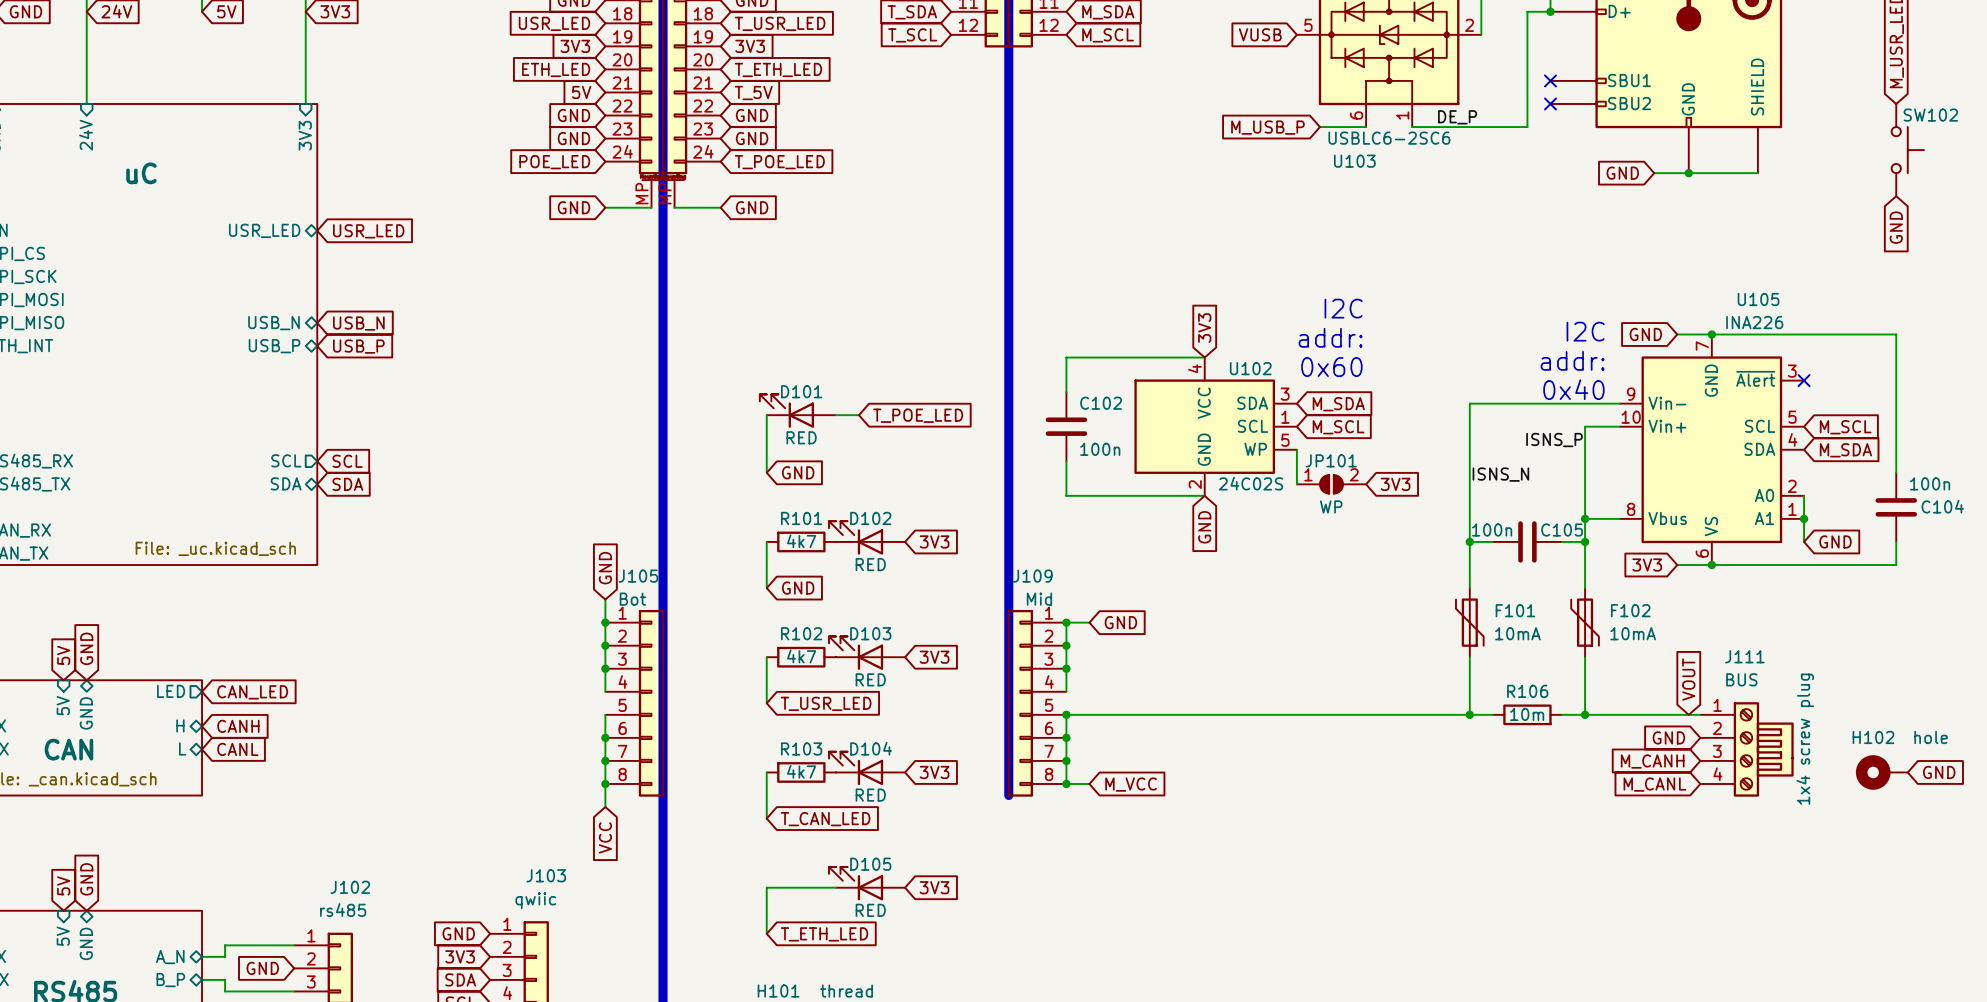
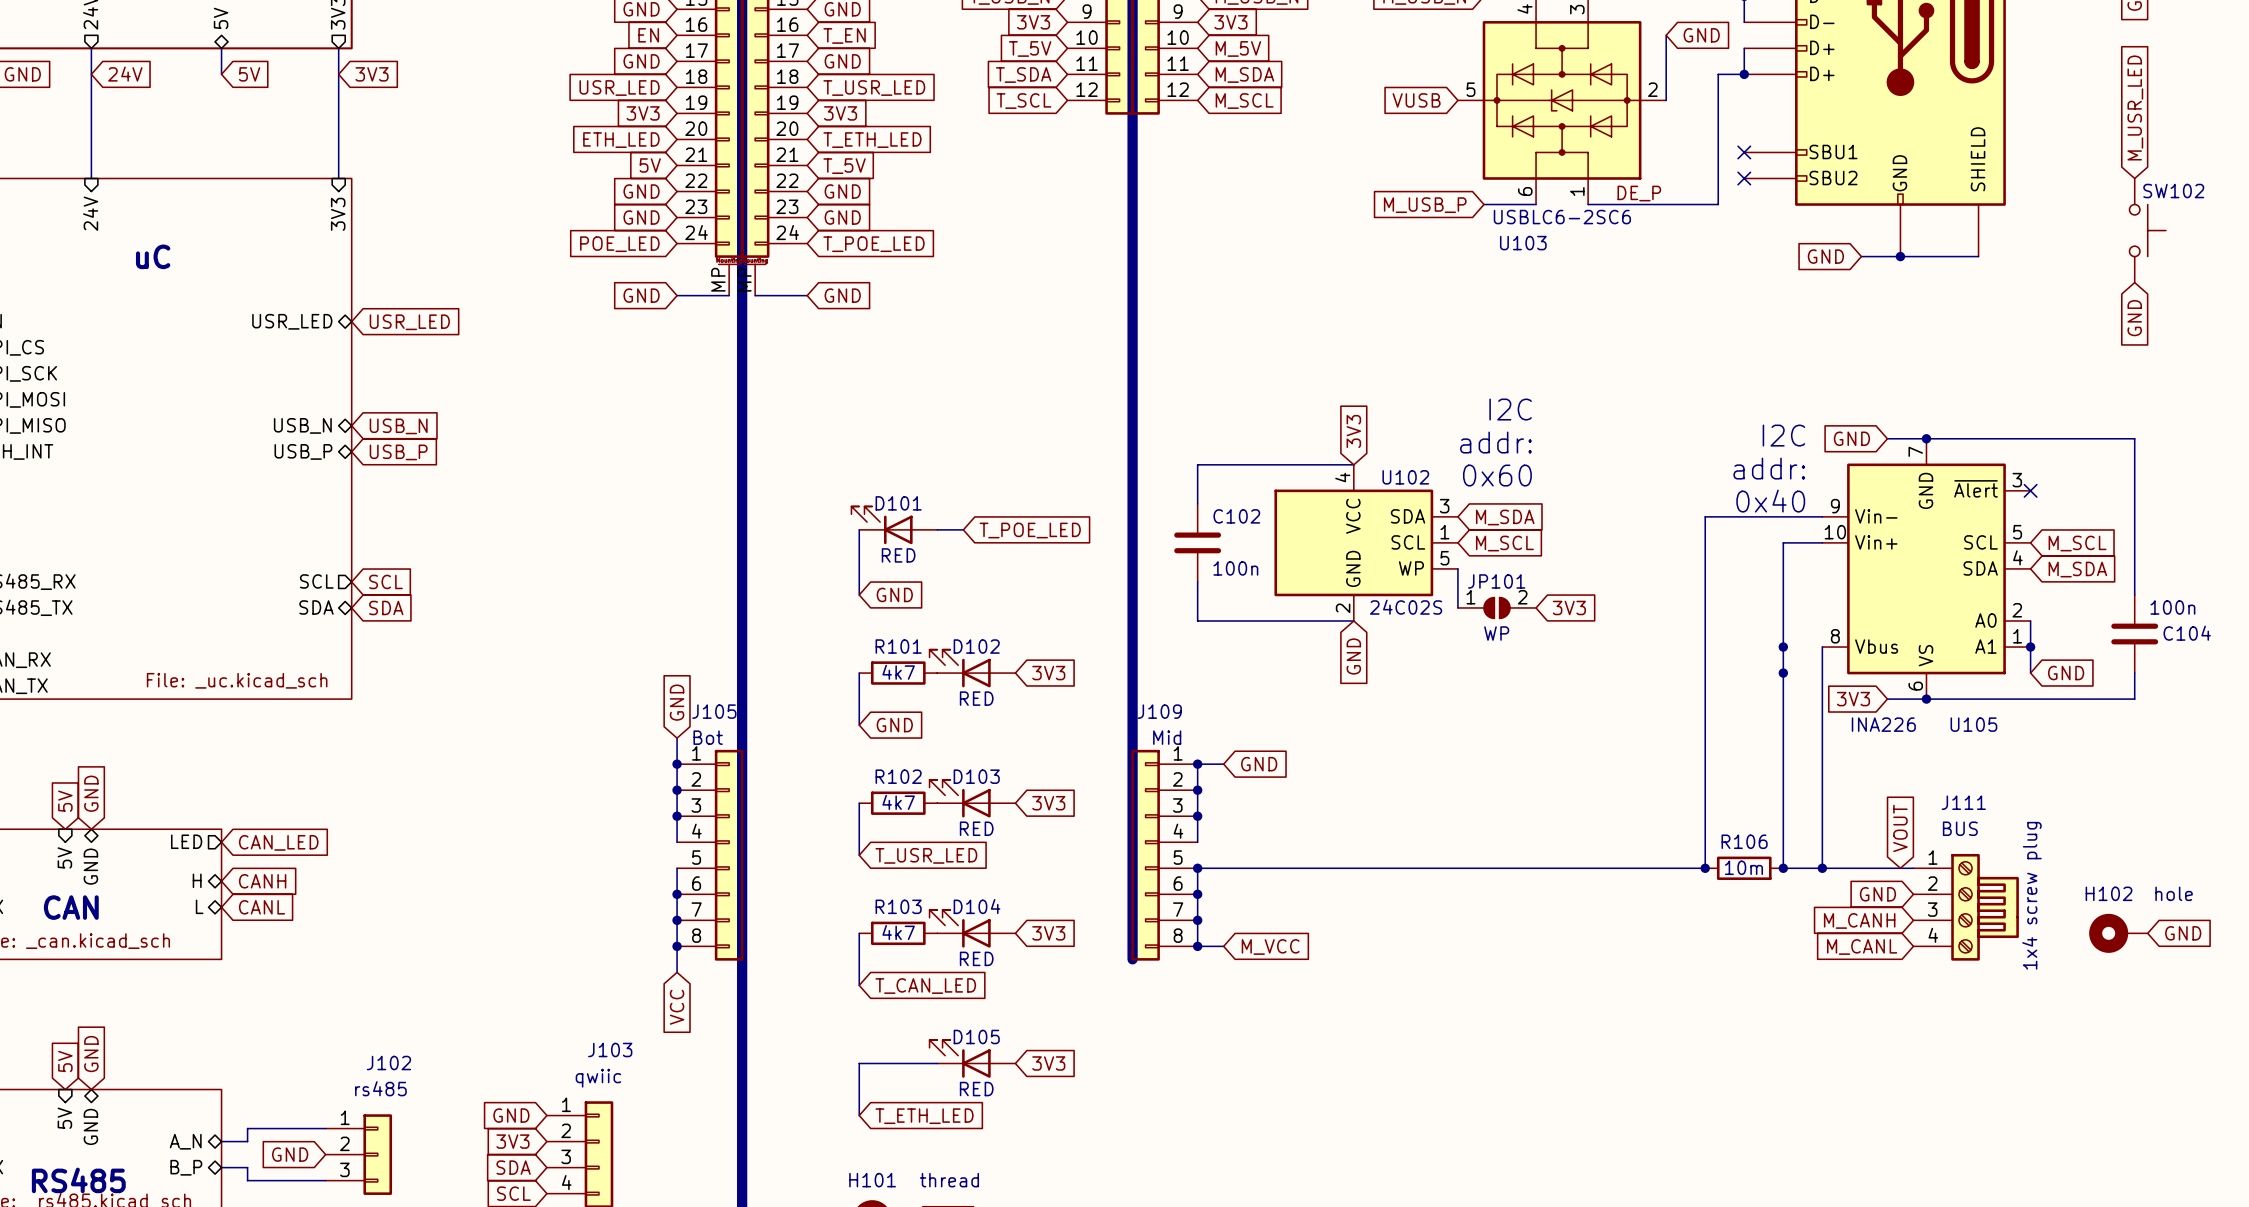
U105 name position: U105 (1758, 299) -> U105 (1973, 724)
U105 value position: INA226 (1754, 322) -> INA226 (1883, 724)
wire: (1515, 403) (1469, 403) (1469, 588) -> (1705, 516) (1705, 868) (1679, 868)
label: ISNS_P (1554, 440) -> none
label: ISNS_N (1500, 474) -> none
wire: (1585, 518) (1619, 518) -> (1822, 868) (1822, 647)
wire: (1469, 541) (1492, 541) -> none
junction: (1469, 541) -> none
C105: 100n (1527, 541) -> none
wire: (1562, 541) (1585, 541) -> none
F101: 10mA (1469, 622) -> none
F102: 10mA (1585, 622) -> none
wire: (1469, 657) (1469, 714) -> none
junction position: (1469, 714) -> (1705, 868)
R106 position: (1527, 714) -> (1744, 868)
junction: none -> (1822, 868)

